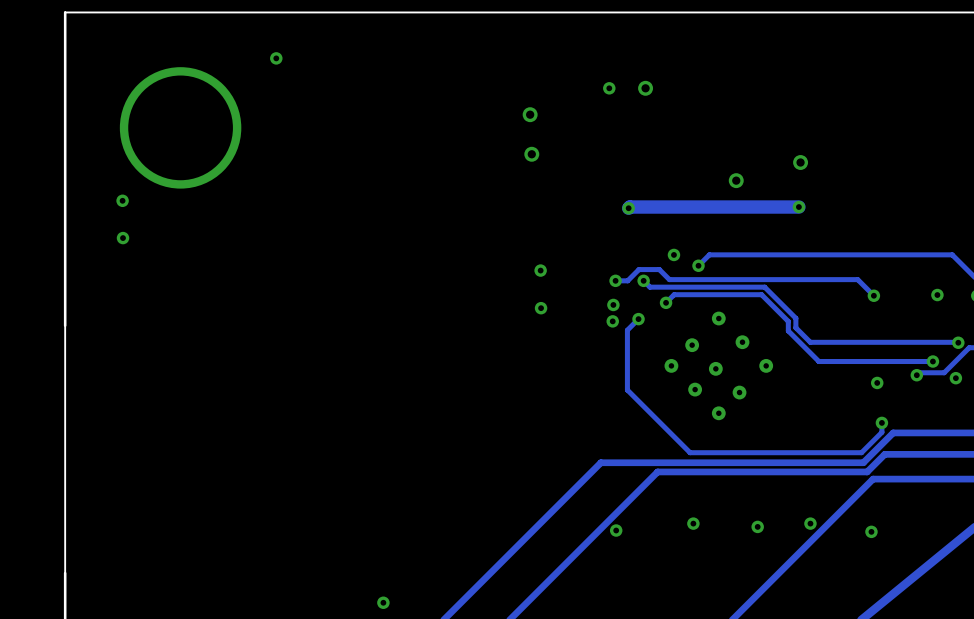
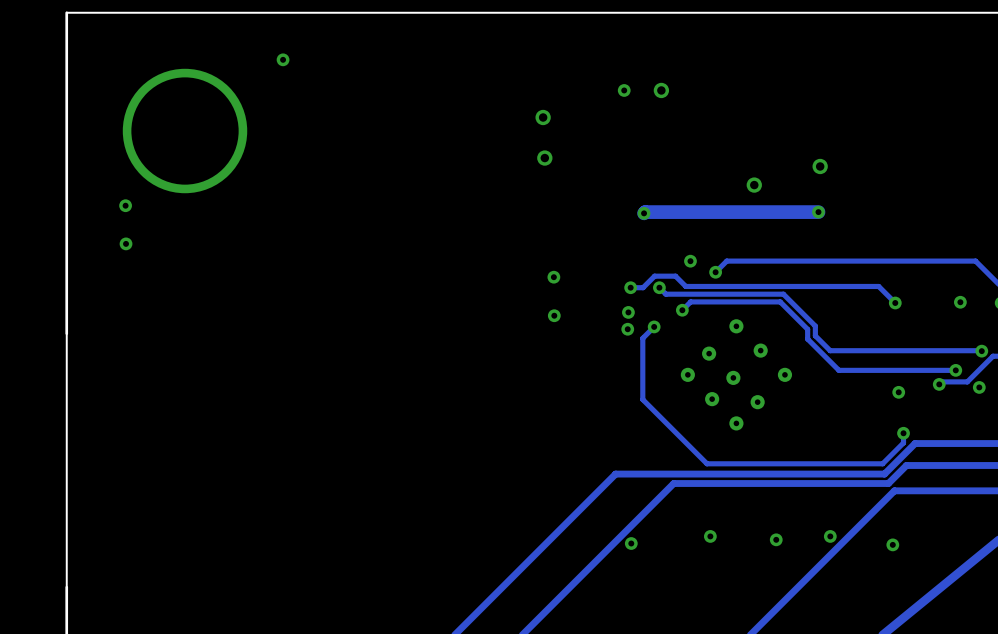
via: (383, 602) -> none

